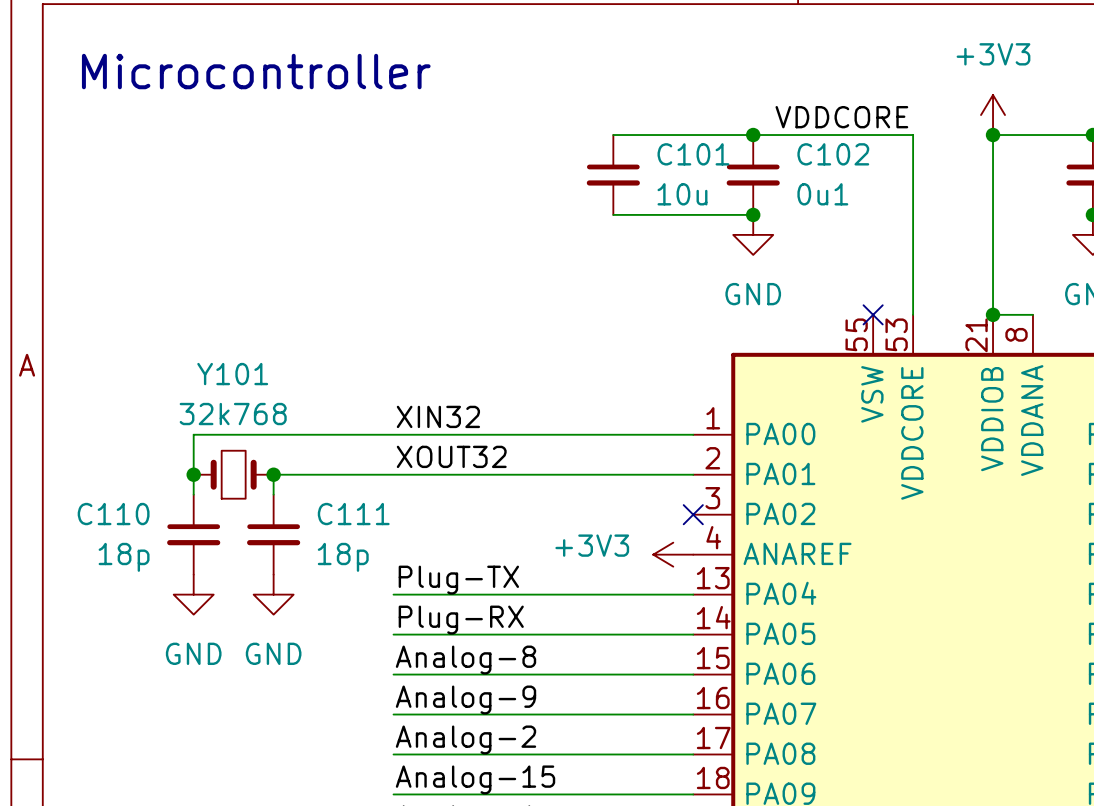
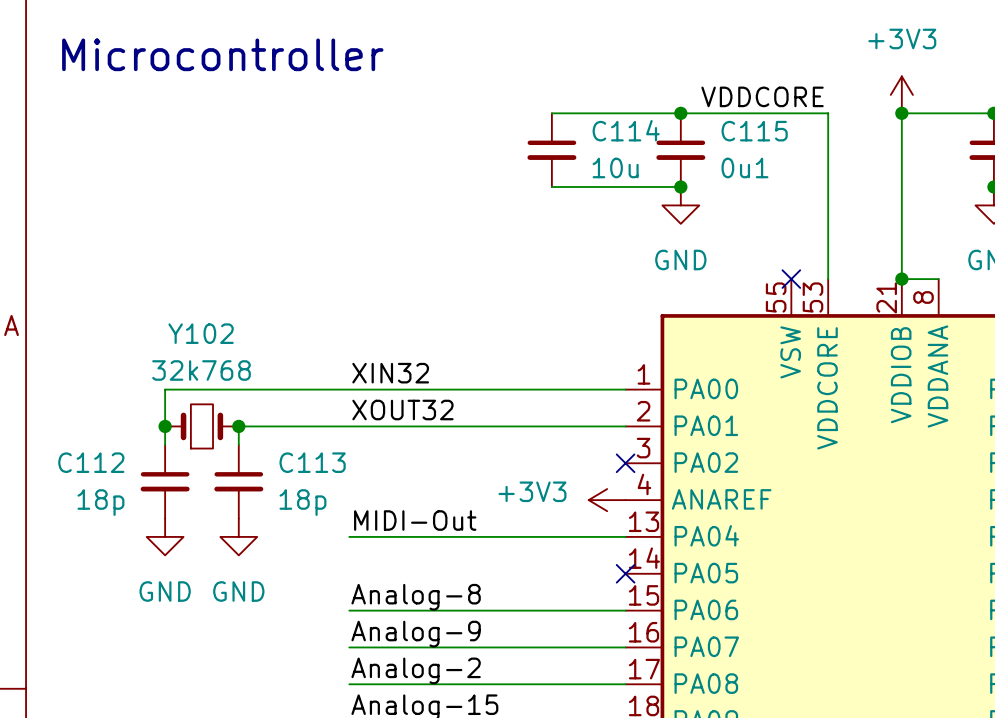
C101 name: C101 (693, 154) -> C114 (626, 130)
C102 name: C102 (833, 154) -> C115 (754, 131)
Y101 name: Y101 (232, 374) -> Y102 (201, 333)
C110 name: C110 (113, 514) -> C112 (91, 462)
C111 name: C111 (353, 514) -> C113 (312, 462)
label: Plug-TX (458, 580) -> MIDI-Out (415, 520)
label: Plug-RX (461, 620) -> none
wire: (393, 634) (693, 634) -> none
no-connect mark: none -> (625, 573)

